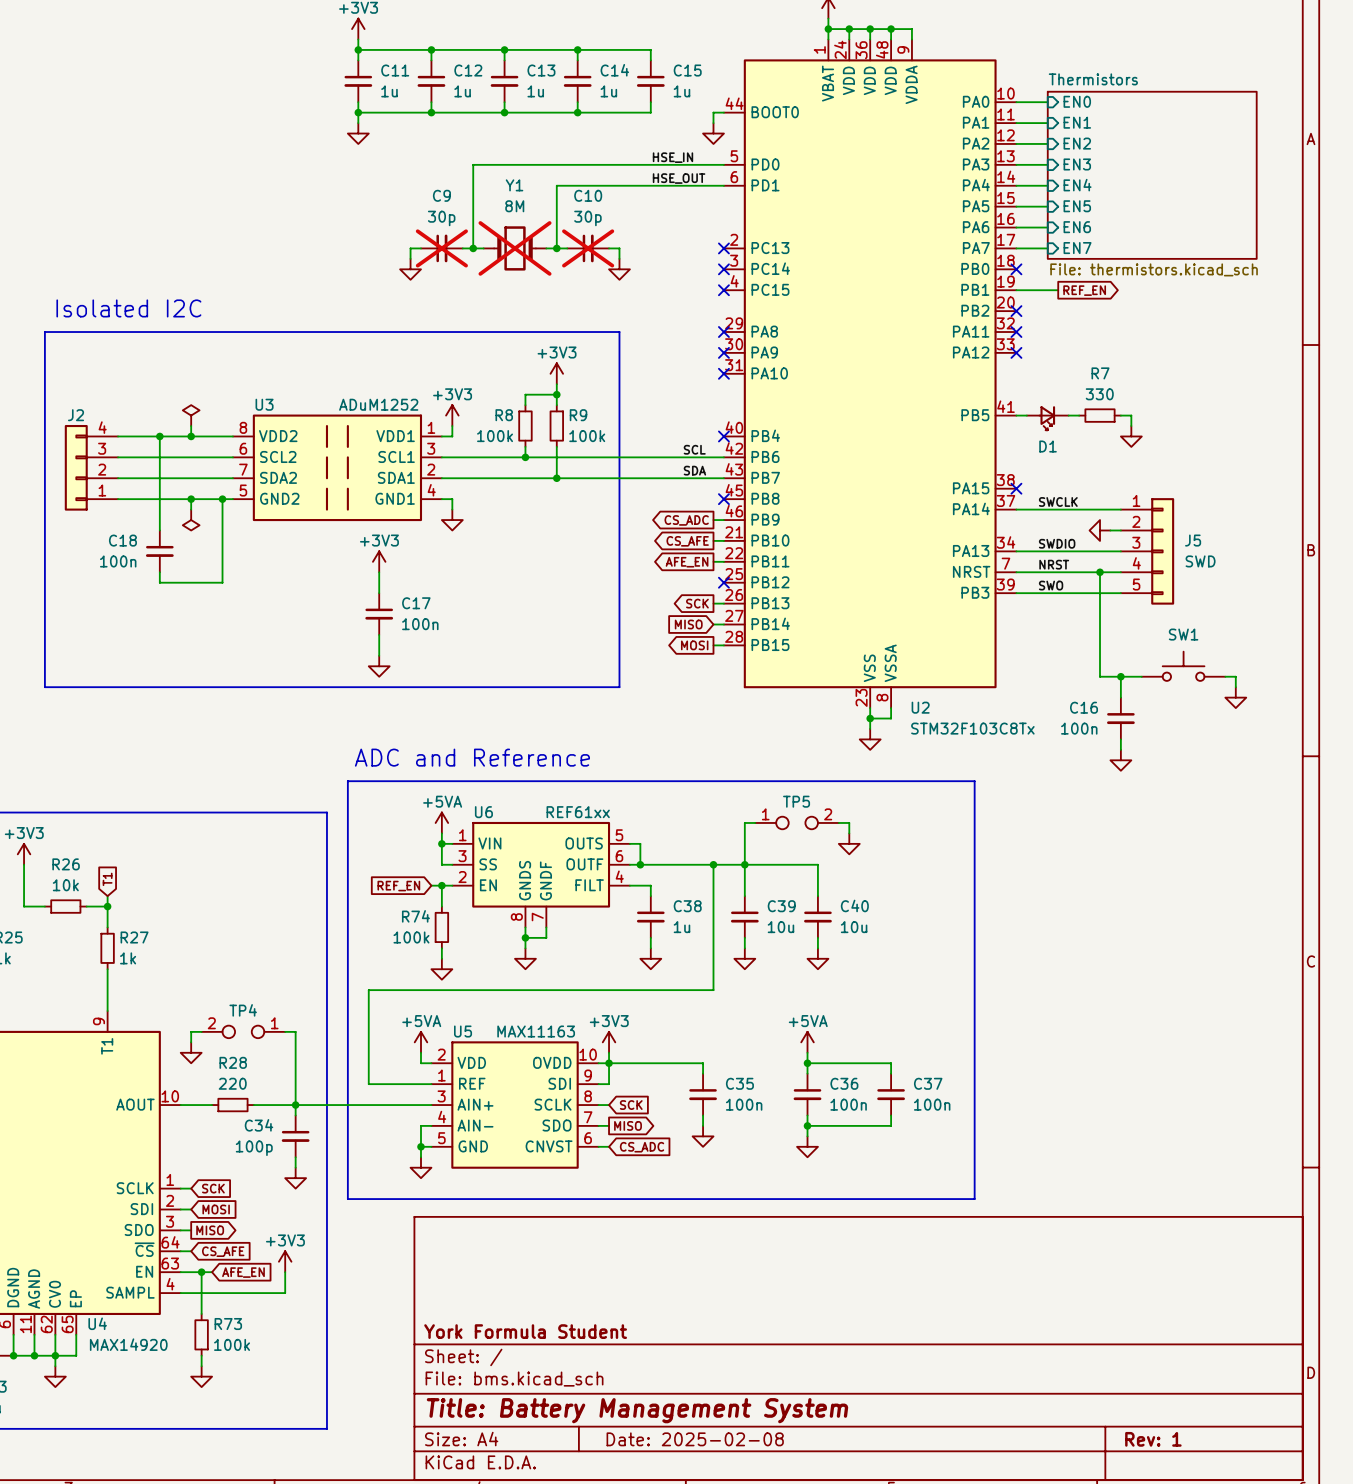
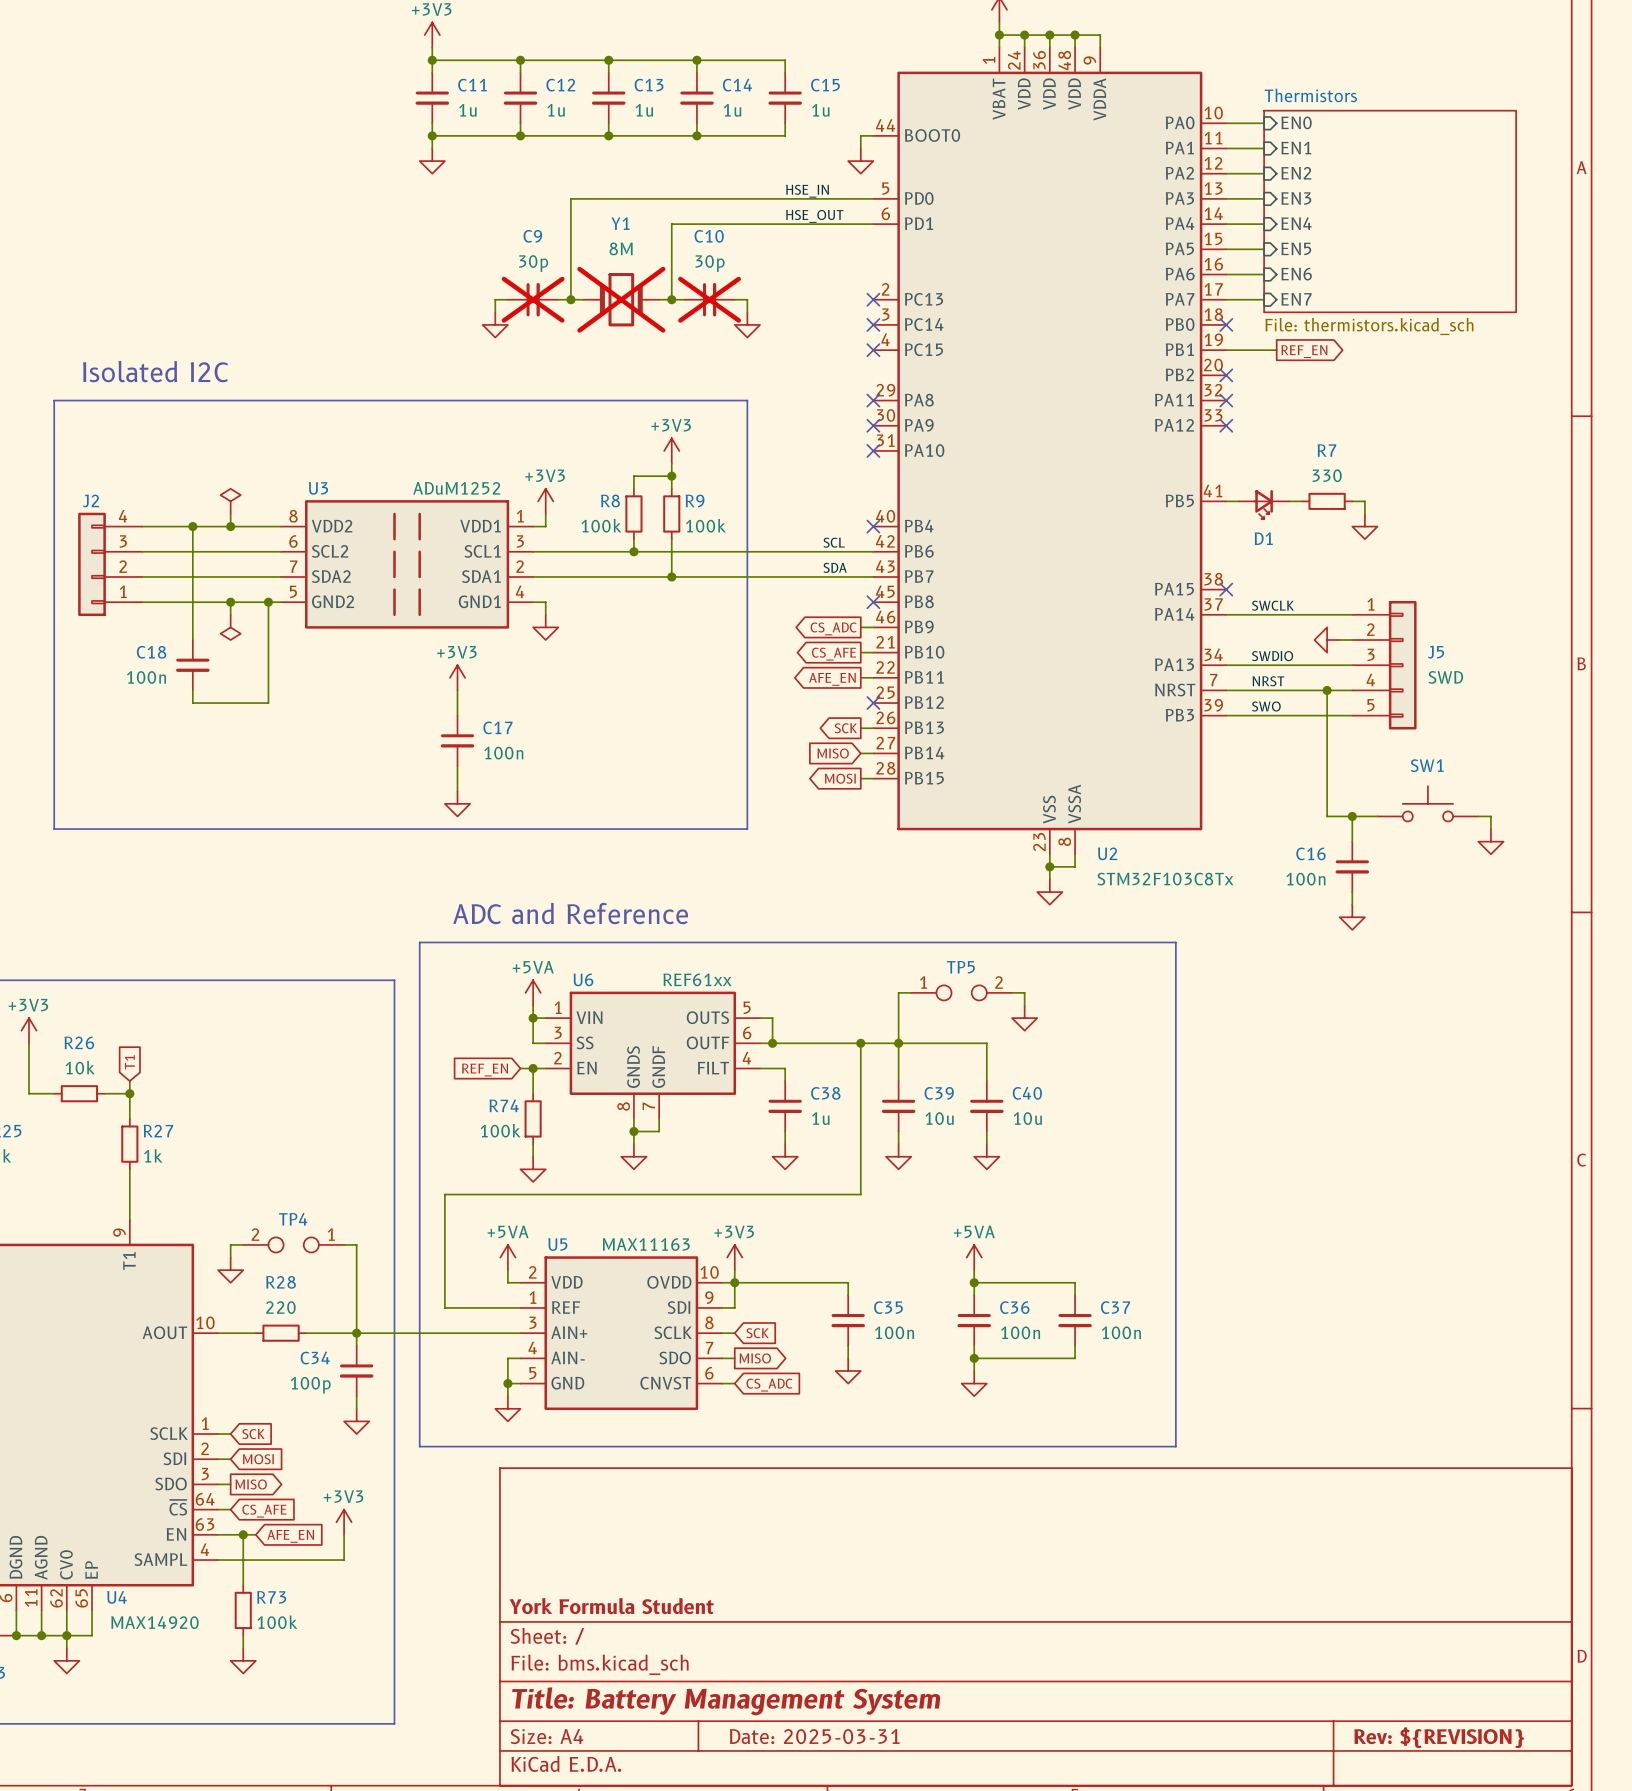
title block: Date: 2025-02-08 (695, 1439) -> Date: 2025-03-31 (814, 1736)
title block: Rev: 1 (1153, 1439) -> Rev: ${REVISION} (1439, 1737)

